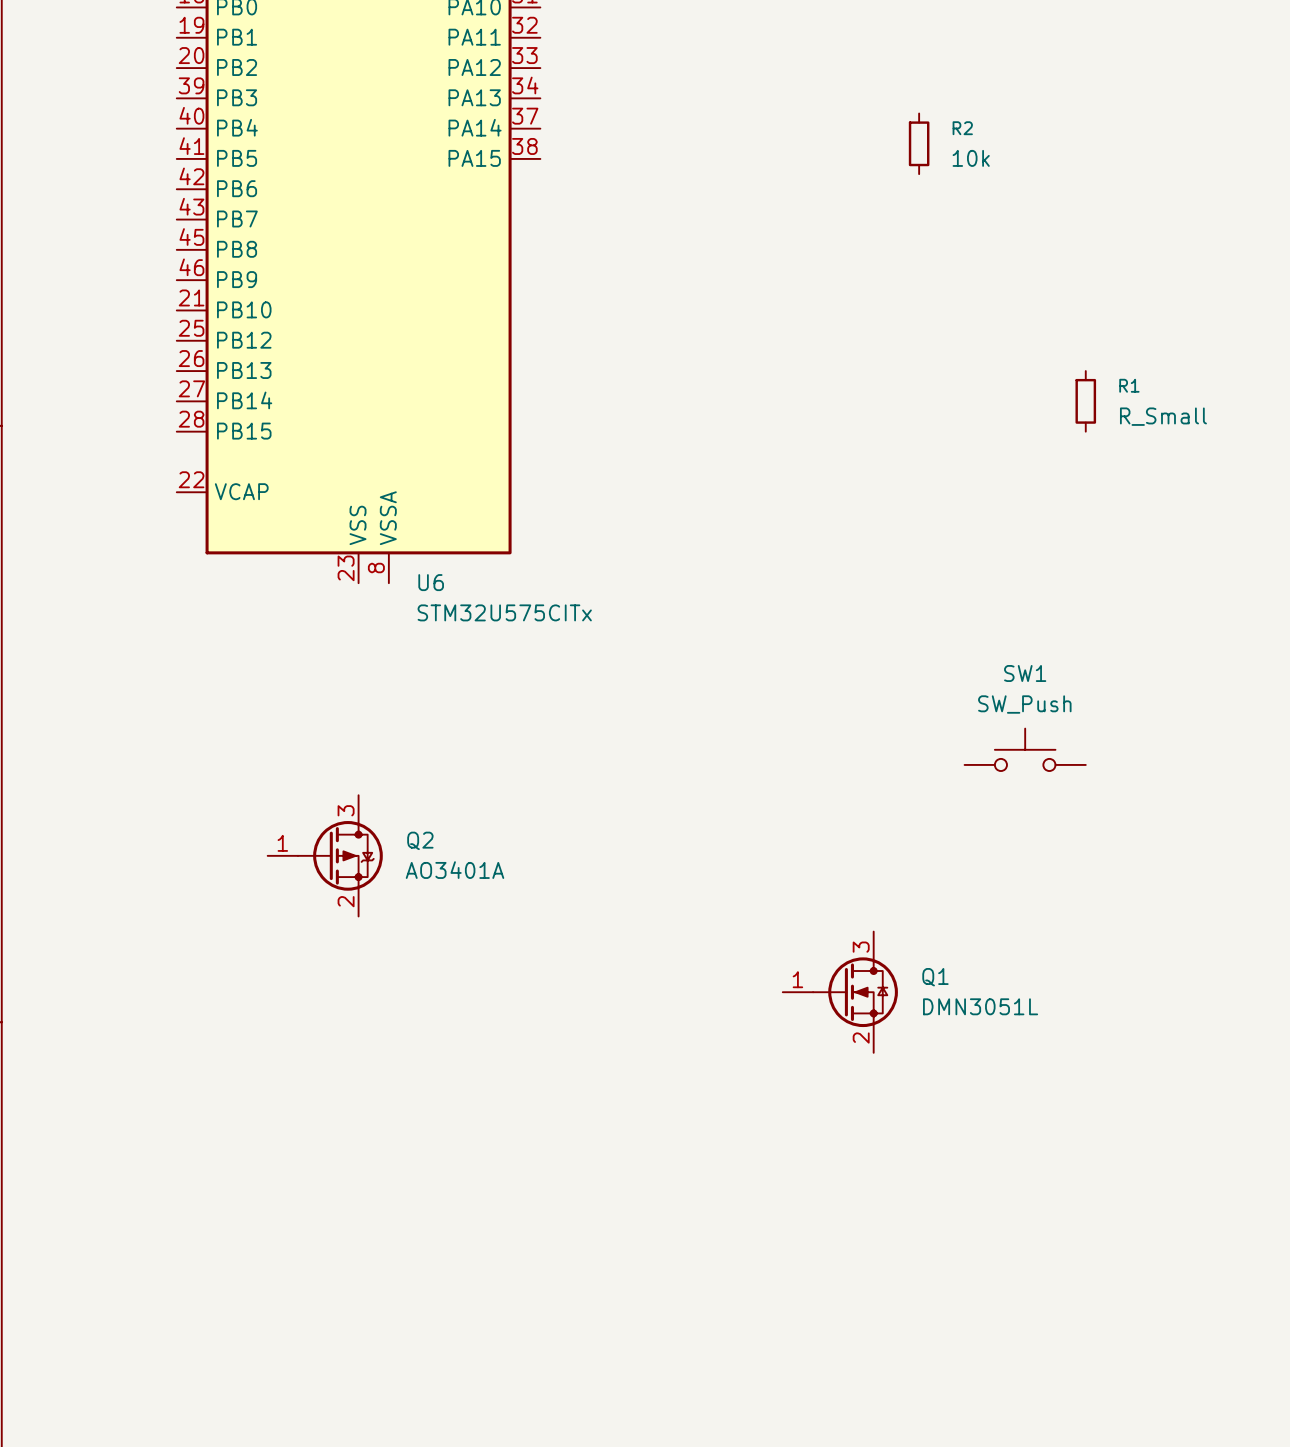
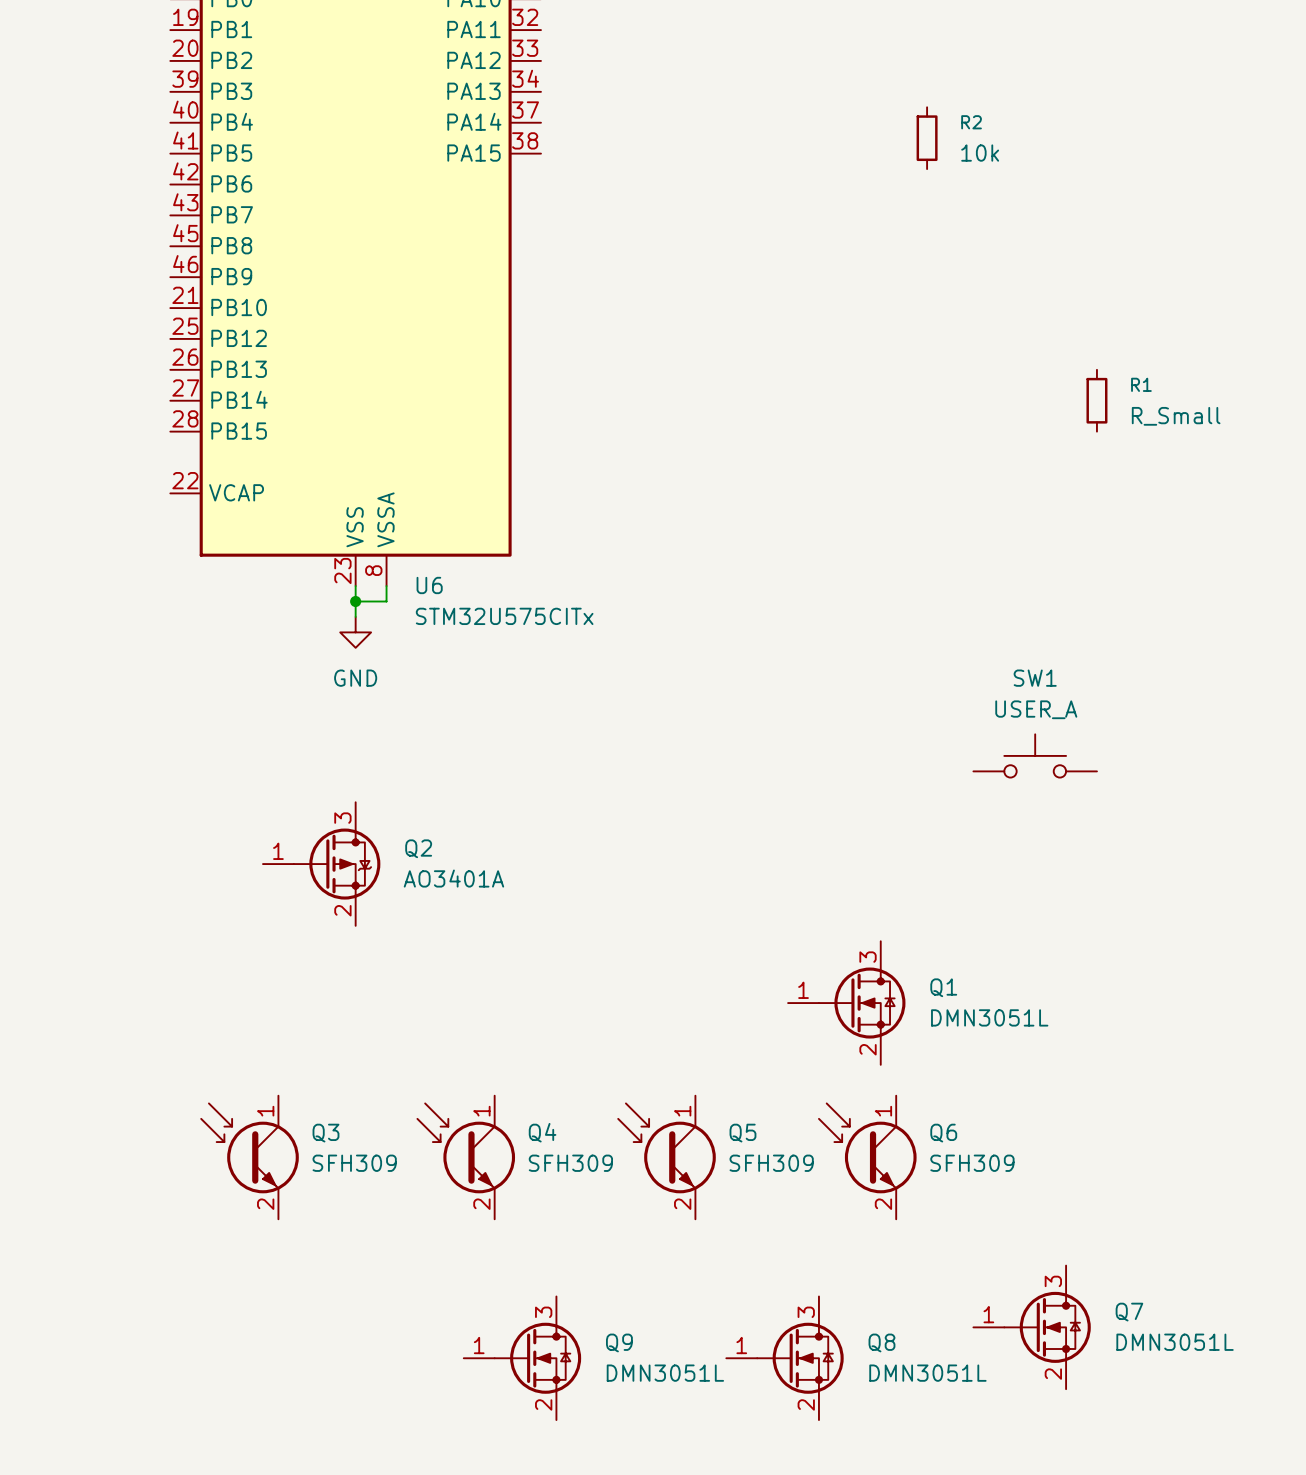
wire: none -> (355, 586) (355, 616)
wire: none -> (386, 586) (386, 601) (355, 601)
junction: none -> (355, 601)
power symbol: none -> GND (355, 632)
SW1 value: SW_Push (1024, 704) -> USER_A (1036, 709)
Q3: none -> SFH309 (250, 1157)
Q4: none -> SFH309 (466, 1157)
Q5: none -> SFH309 (667, 1157)
Q6: none -> SFH309 (867, 1157)
Q7: none -> DMN3051L (1032, 1327)
Q9: none -> DMN3051L (522, 1358)
Q8: none -> DMN3051L (785, 1358)

